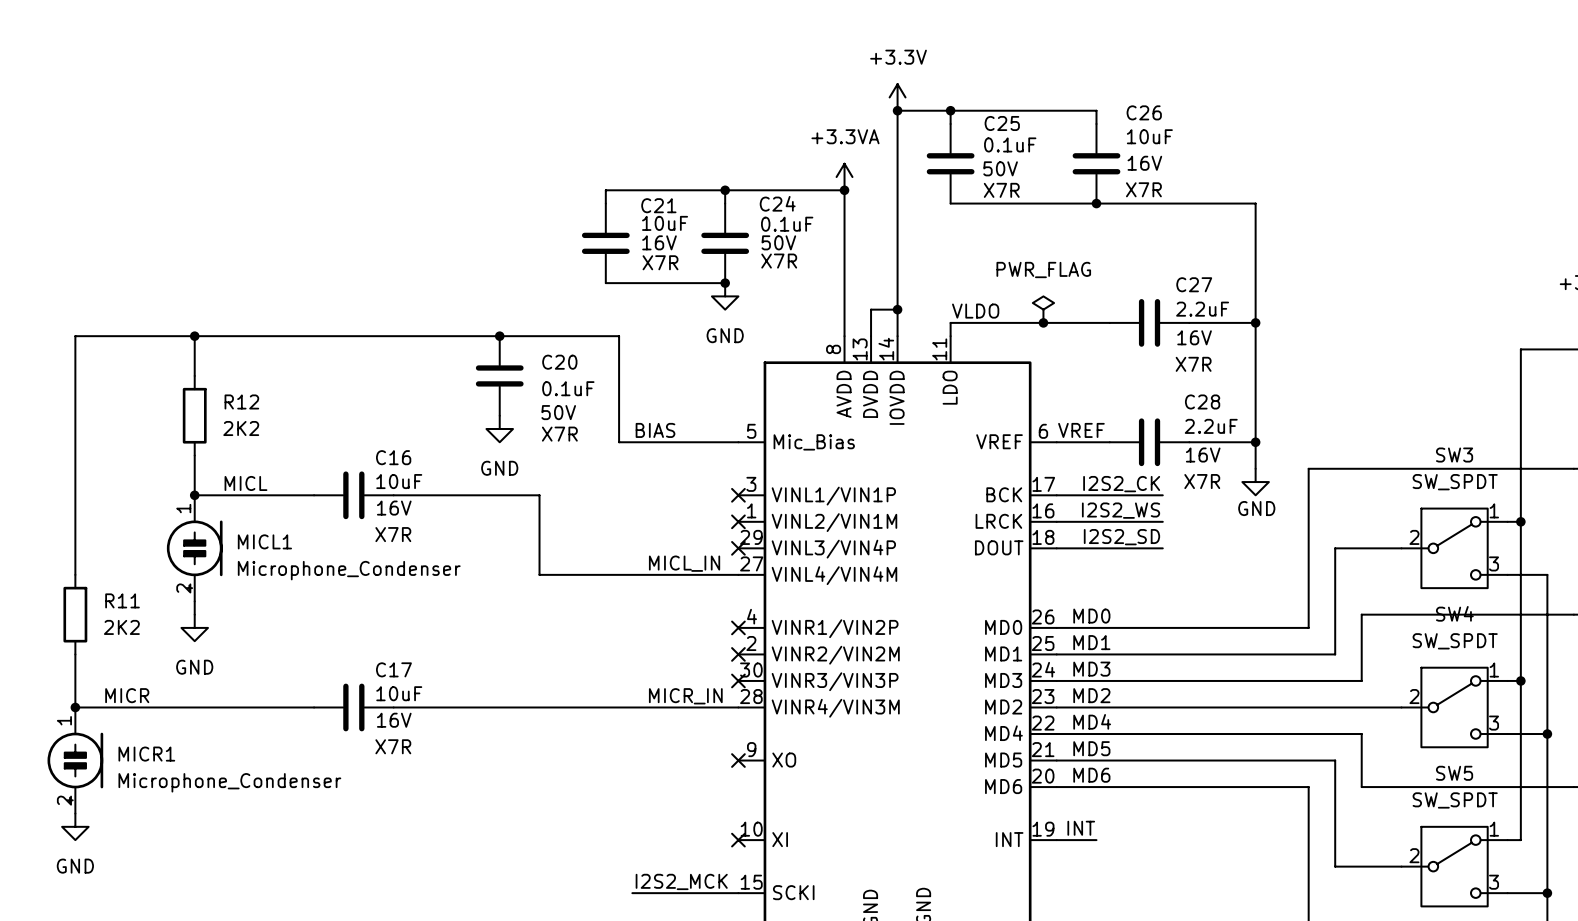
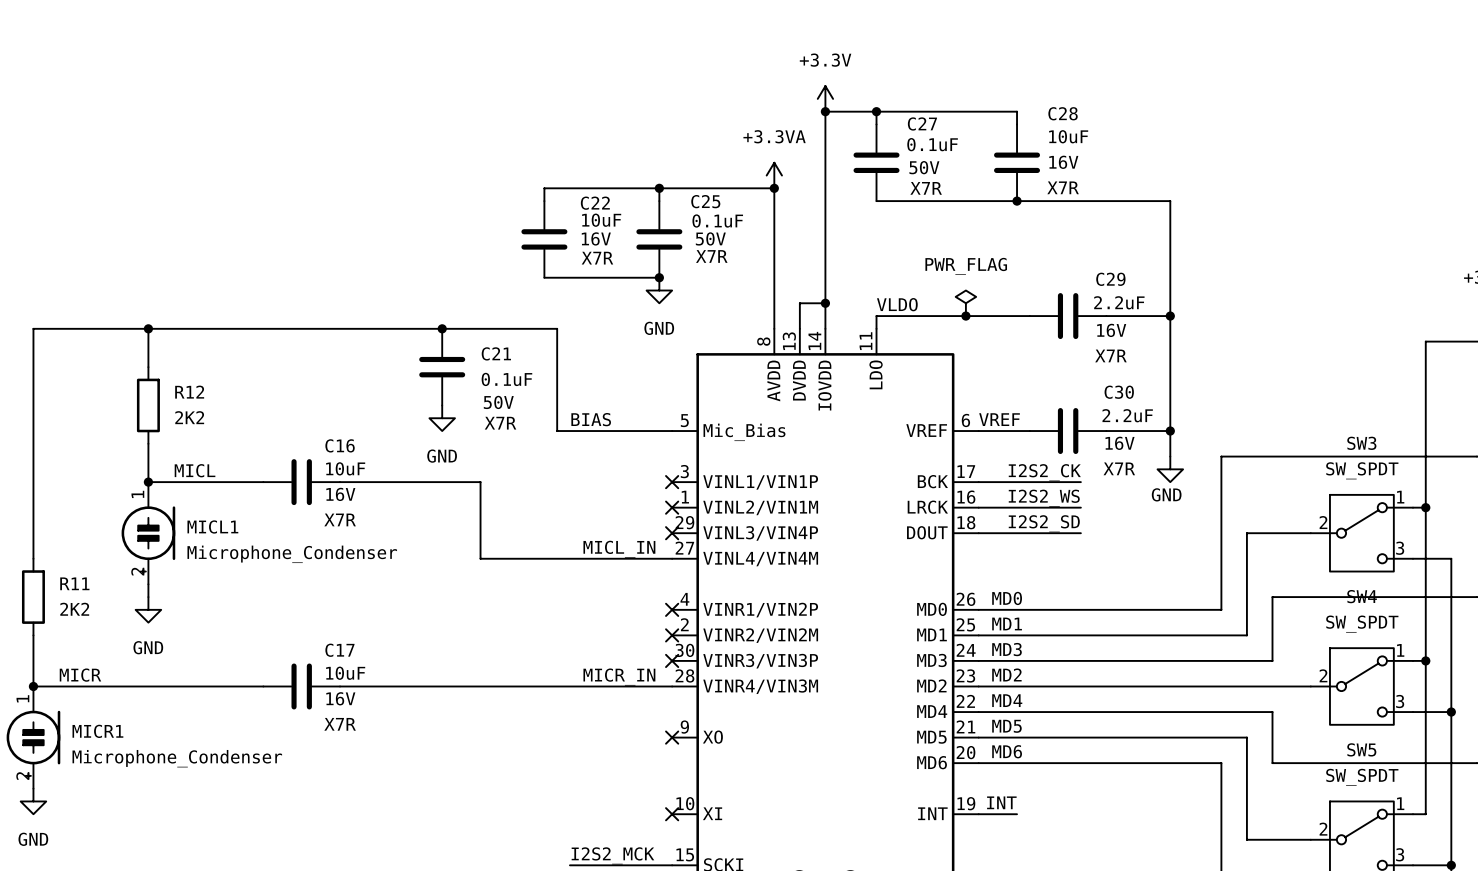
C26 name: C26 (1144, 112) -> C28 (1063, 113)
C25 name: C25 (1002, 123) -> C27 (922, 123)
C24 name: C24 (777, 203) -> C25 (705, 201)
C21 name: C21 (658, 205) -> C22 (595, 203)
C27 name: C27 (1194, 284) -> C29 (1110, 279)
C20 name: C20 (559, 362) -> C21 (496, 353)
C28 name: C28 (1202, 401) -> C30 (1119, 392)

